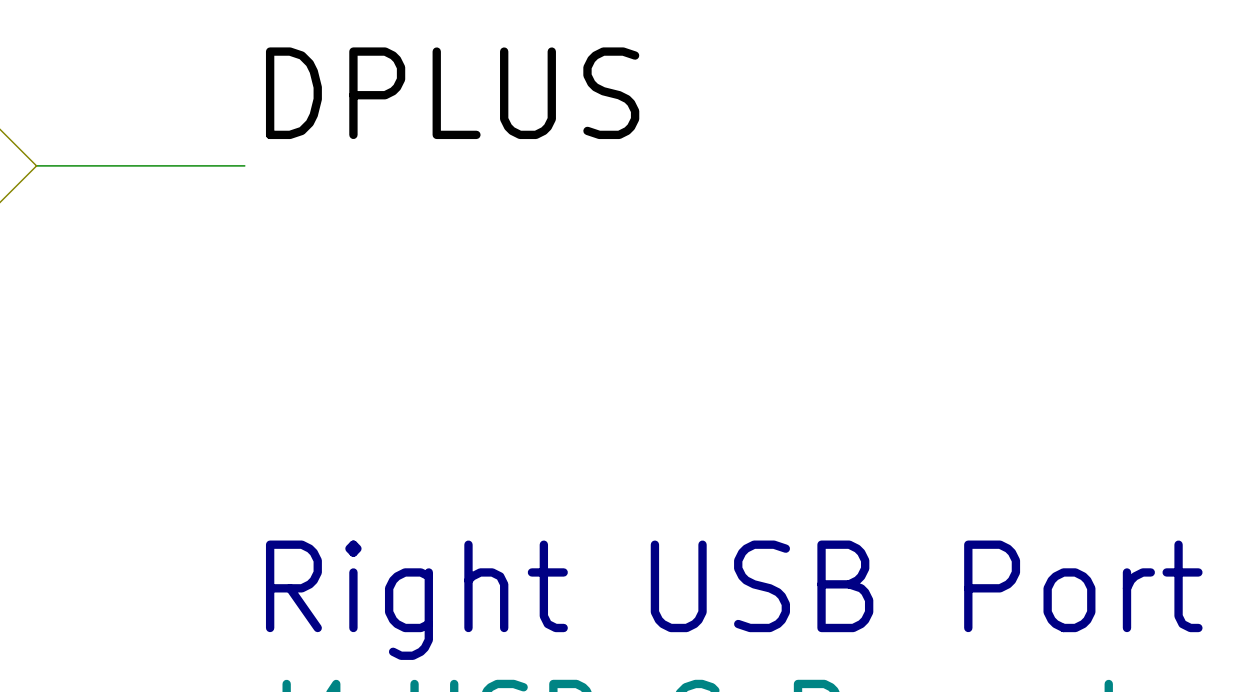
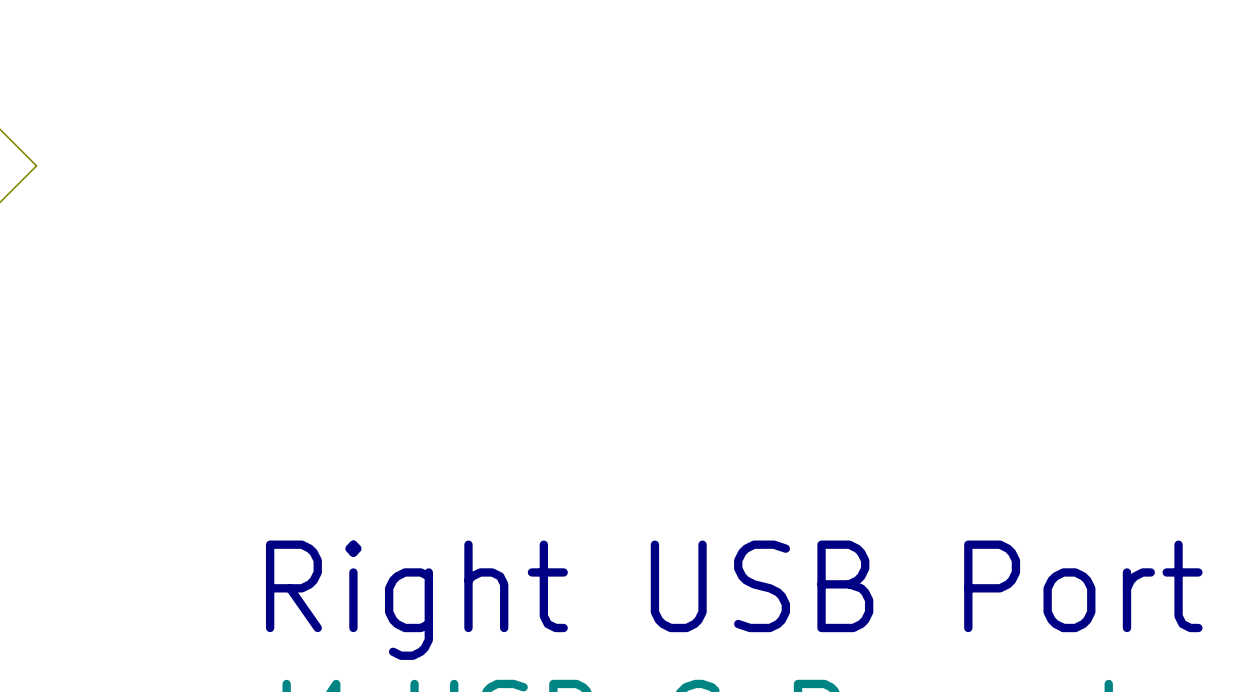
label: DPLUS (452, 93) -> none
wire: (36, 165) (244, 165) -> none

